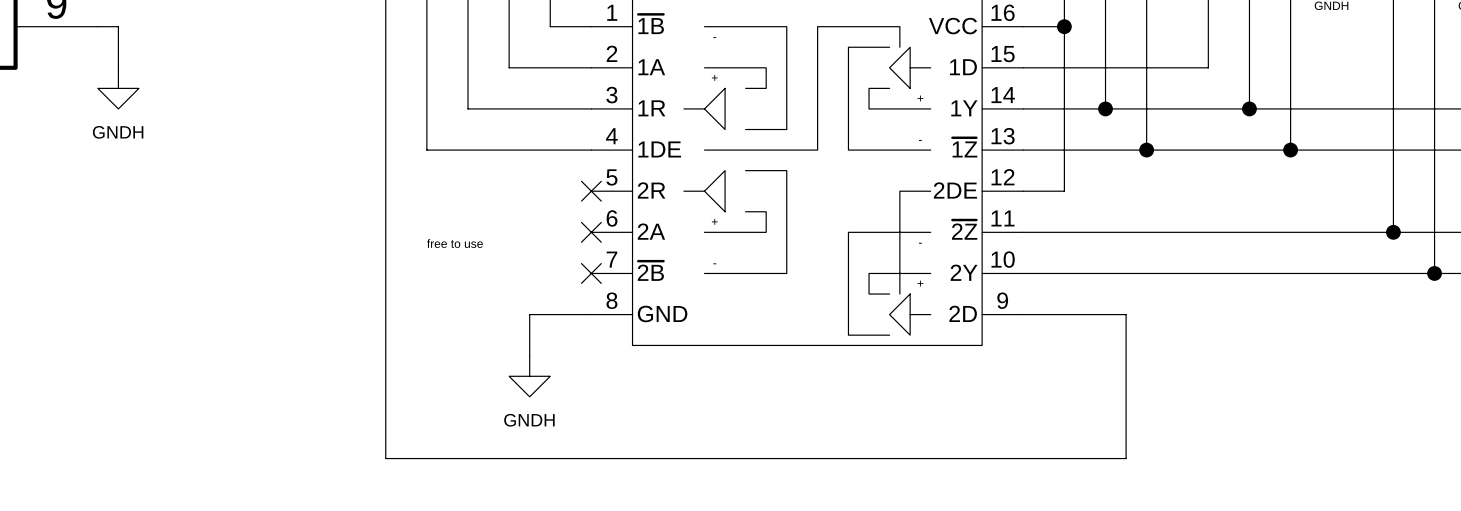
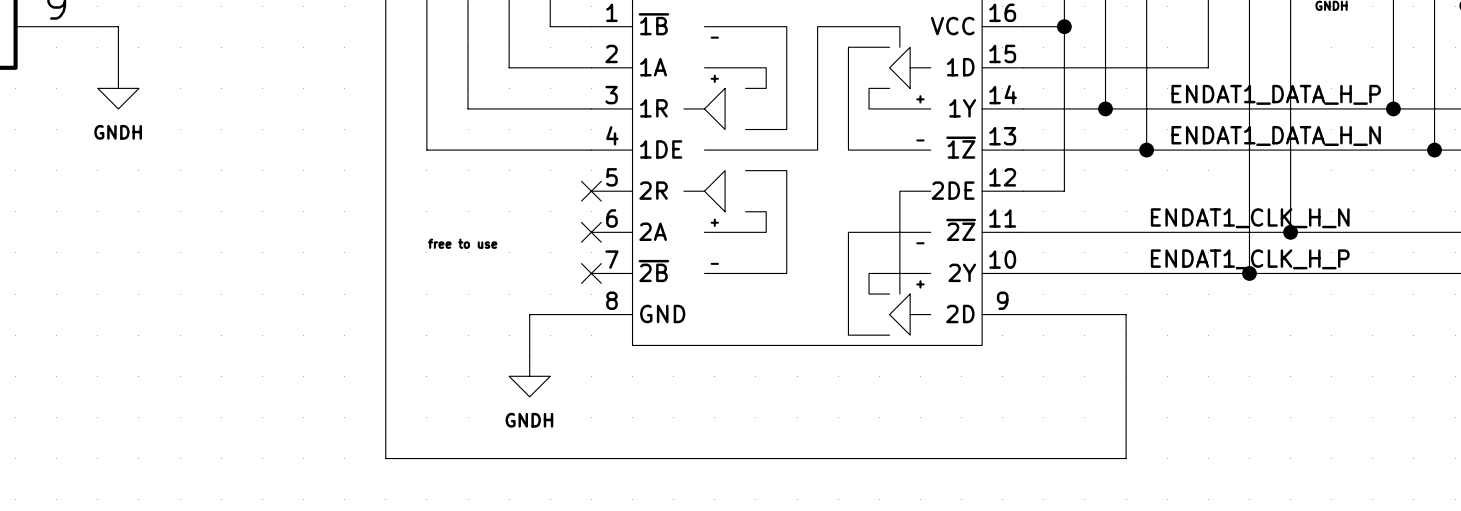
label: none -> ENDAT1_DATA_H_P (1276, 94)
wire: none -> (1249, 108) (1249, 273)
junction: (1249, 108) -> none
wire: (1393, 108) (1393, 232) -> none
junction: none -> (1393, 108)
label: none -> ENDAT1_DATA_H_N (1276, 135)
wire: none -> (1290, 150) (1290, 232)
junction: (1290, 150) -> none
wire: (1434, 150) (1434, 273) -> none
junction: none -> (1434, 150)
label: none -> ENDAT1_CLK_H_N (1250, 218)
junction: none -> (1290, 232)
junction: (1393, 232) -> none
label: none -> ENDAT1_CLK_H_P (1250, 259)
junction: none -> (1249, 273)
junction: (1434, 273) -> none

